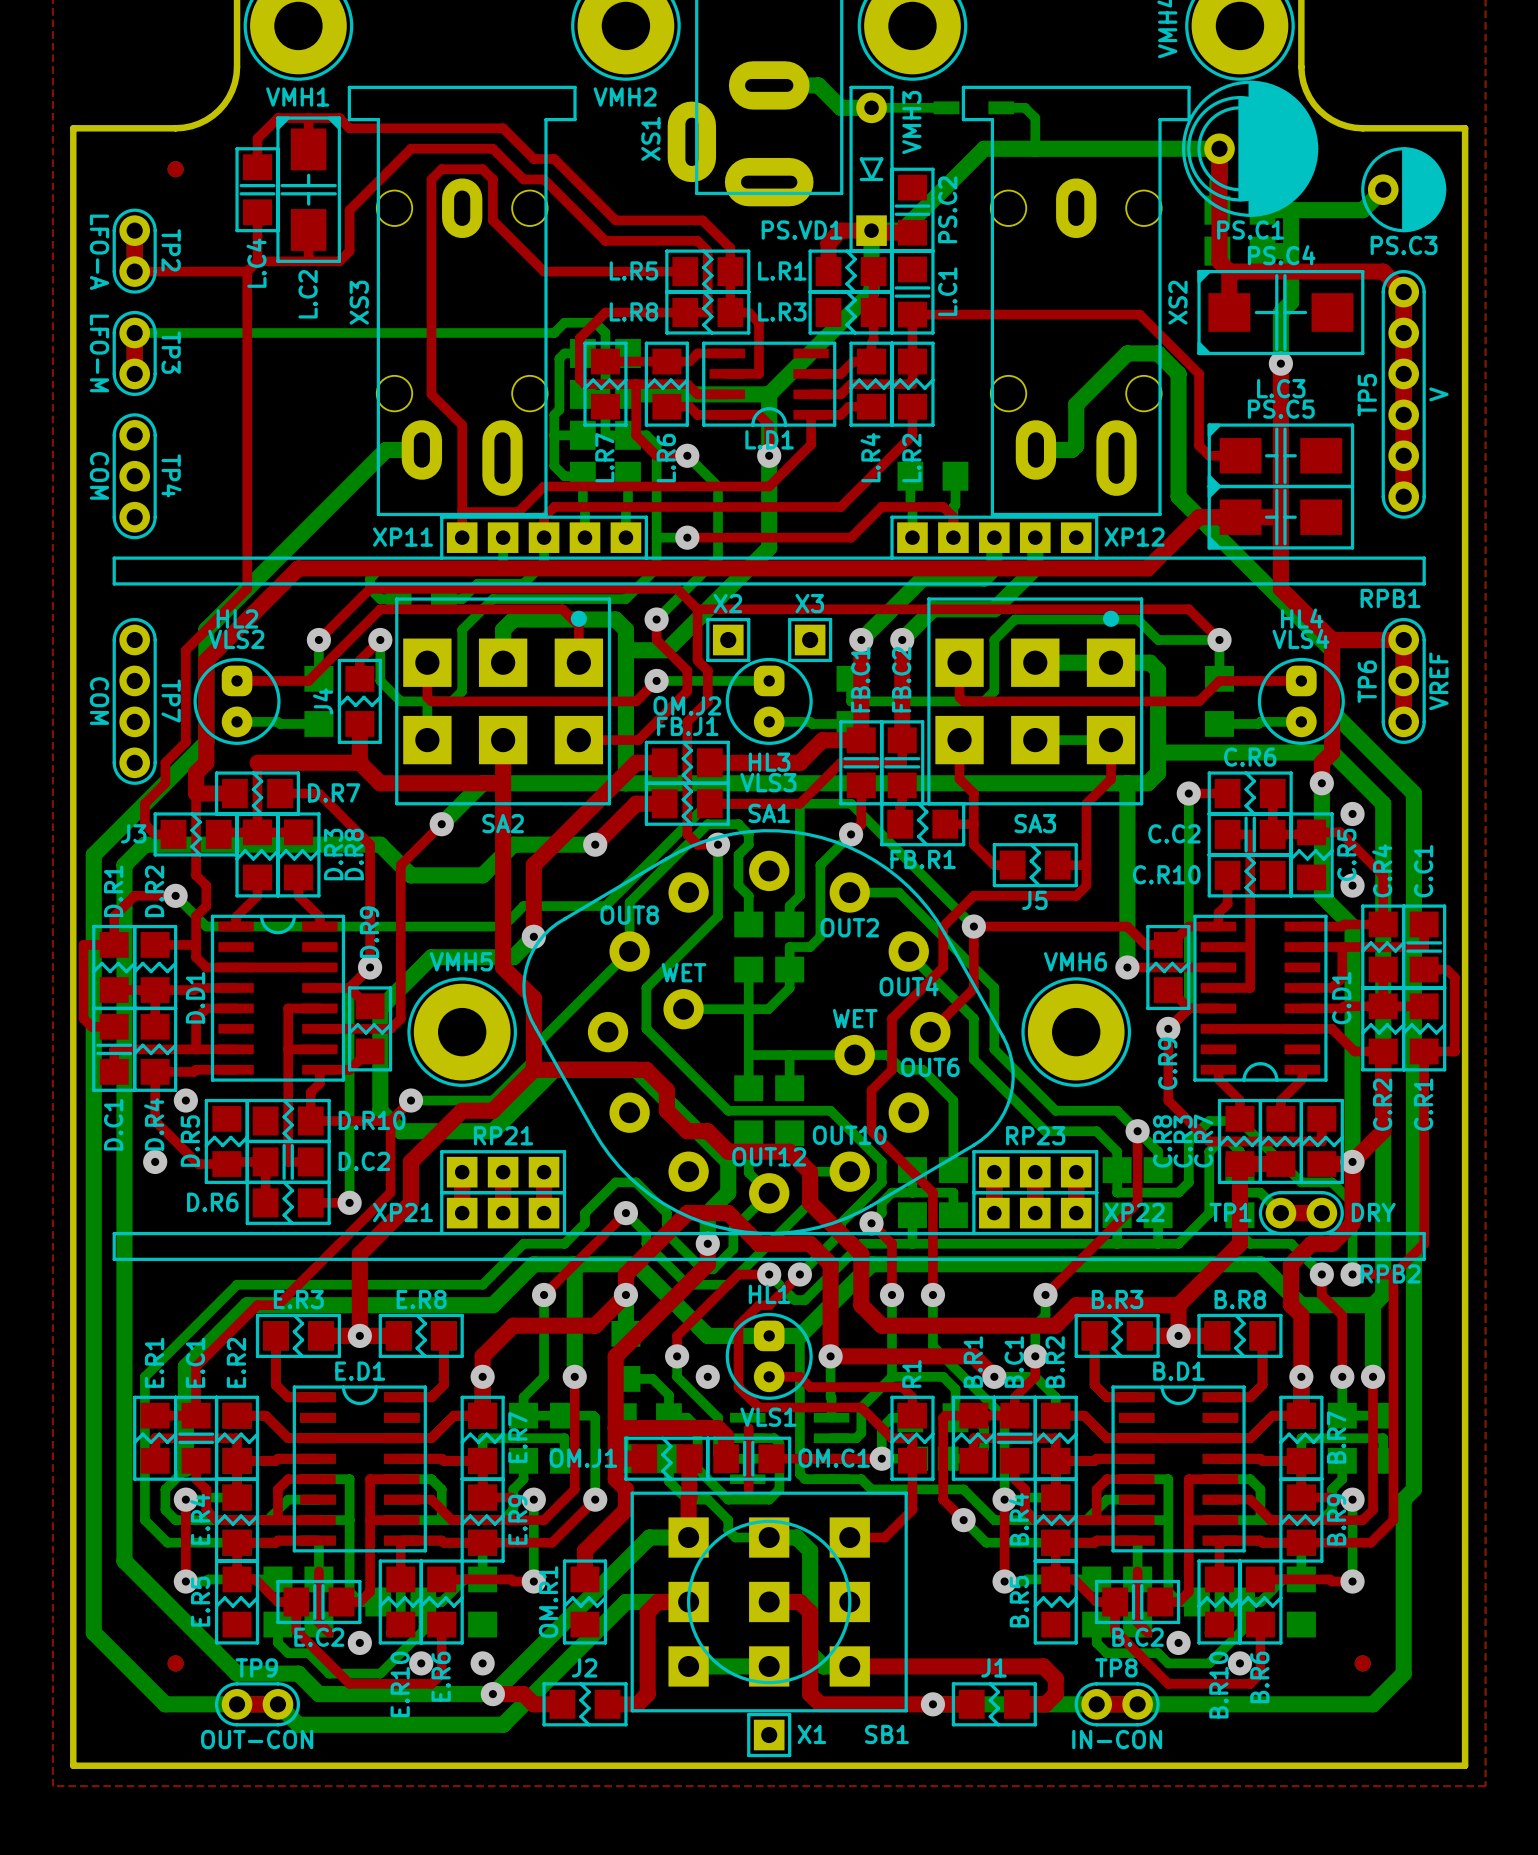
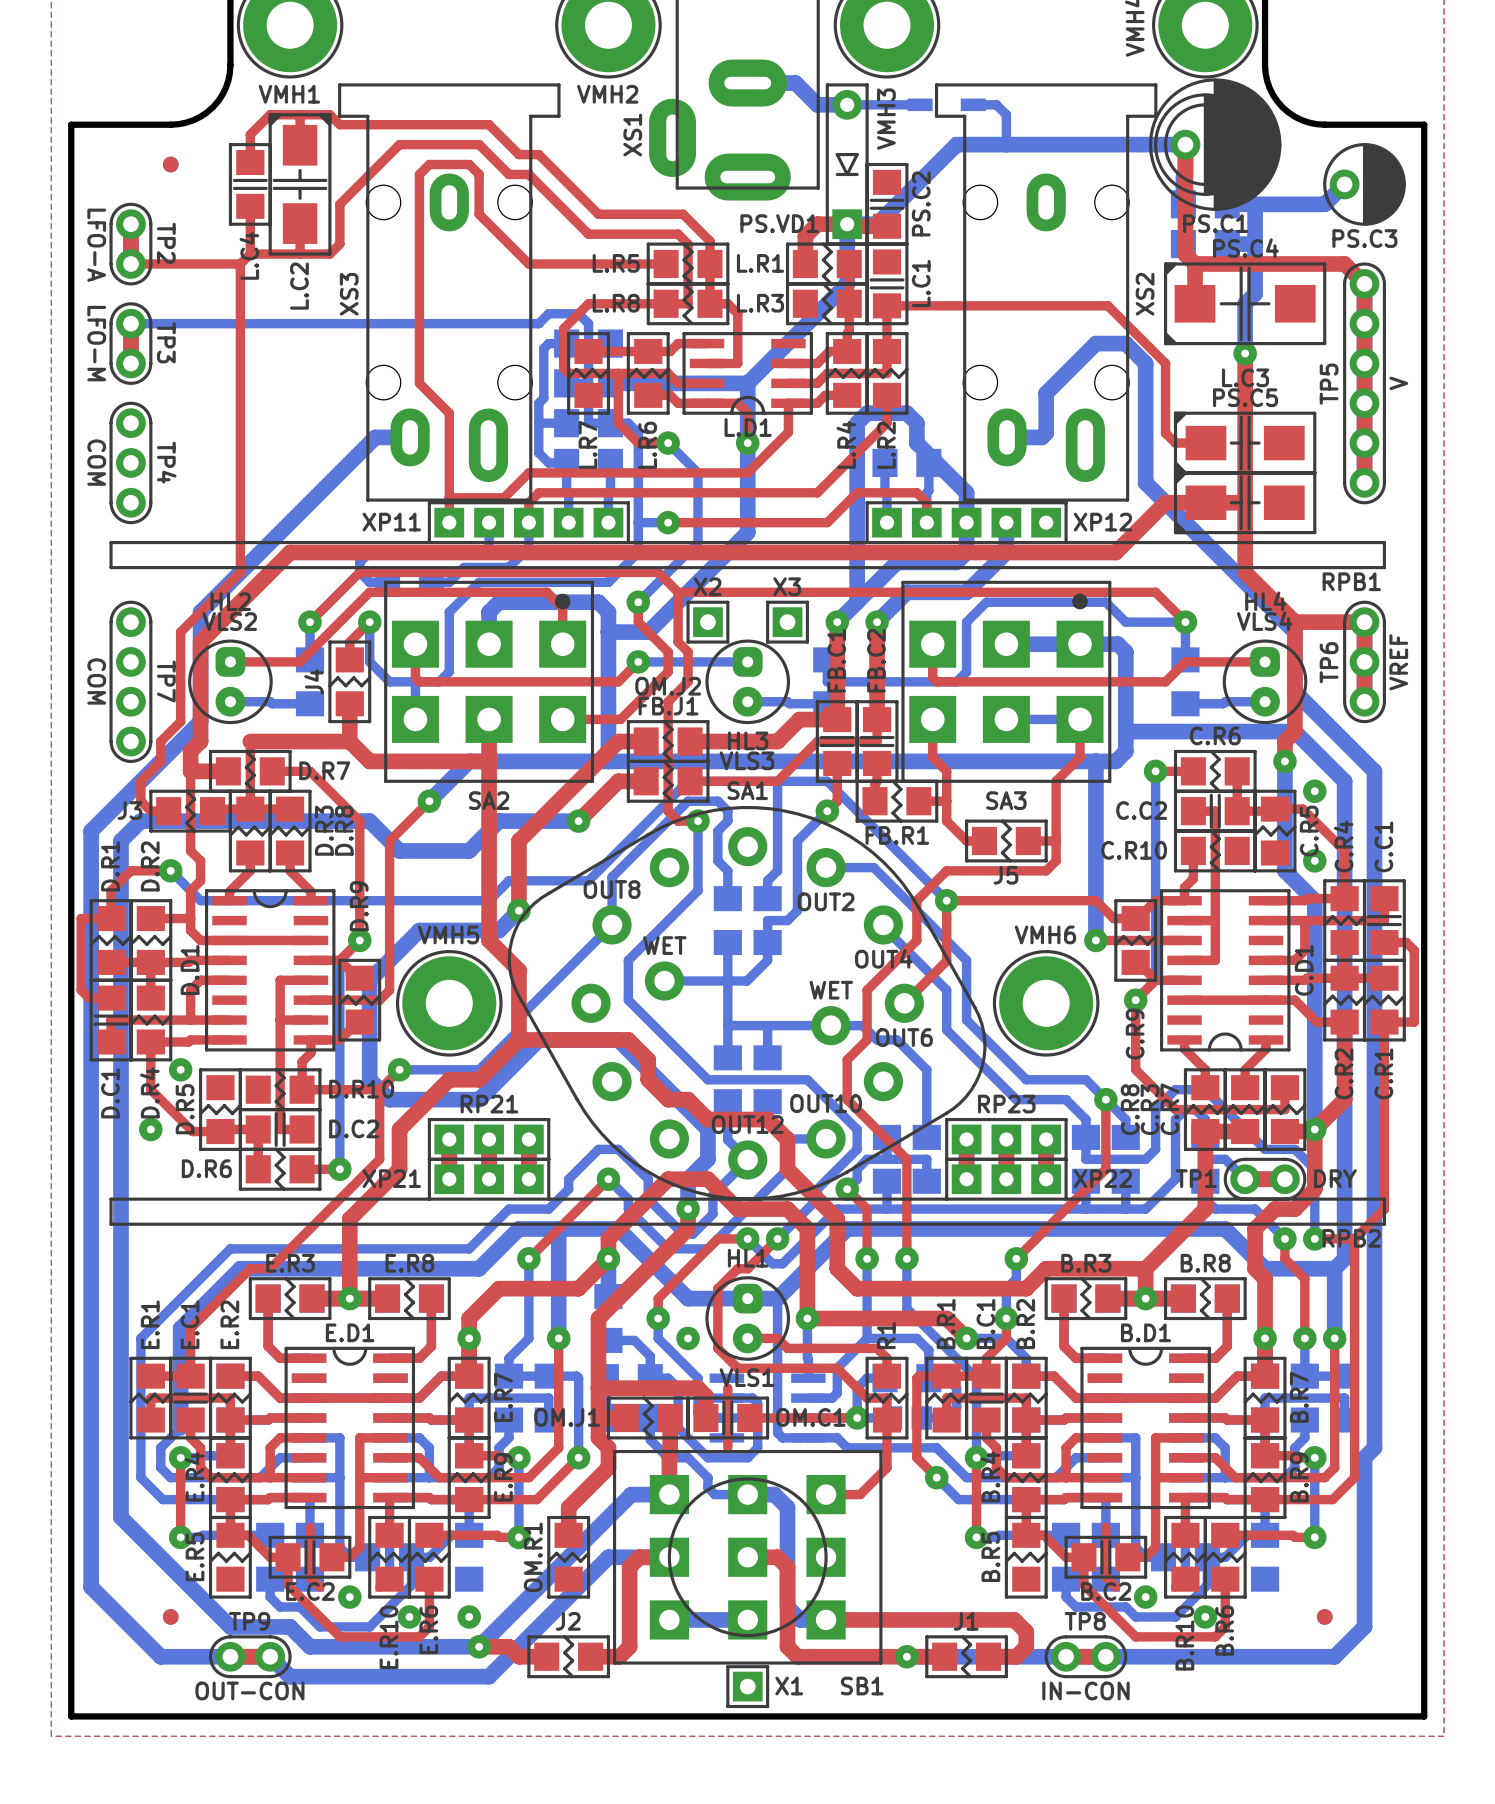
bottom track: none -> (966, 522) (966, 492) (916, 443) (916, 423) (906, 413) (867, 413) (857, 423) (857, 602)

